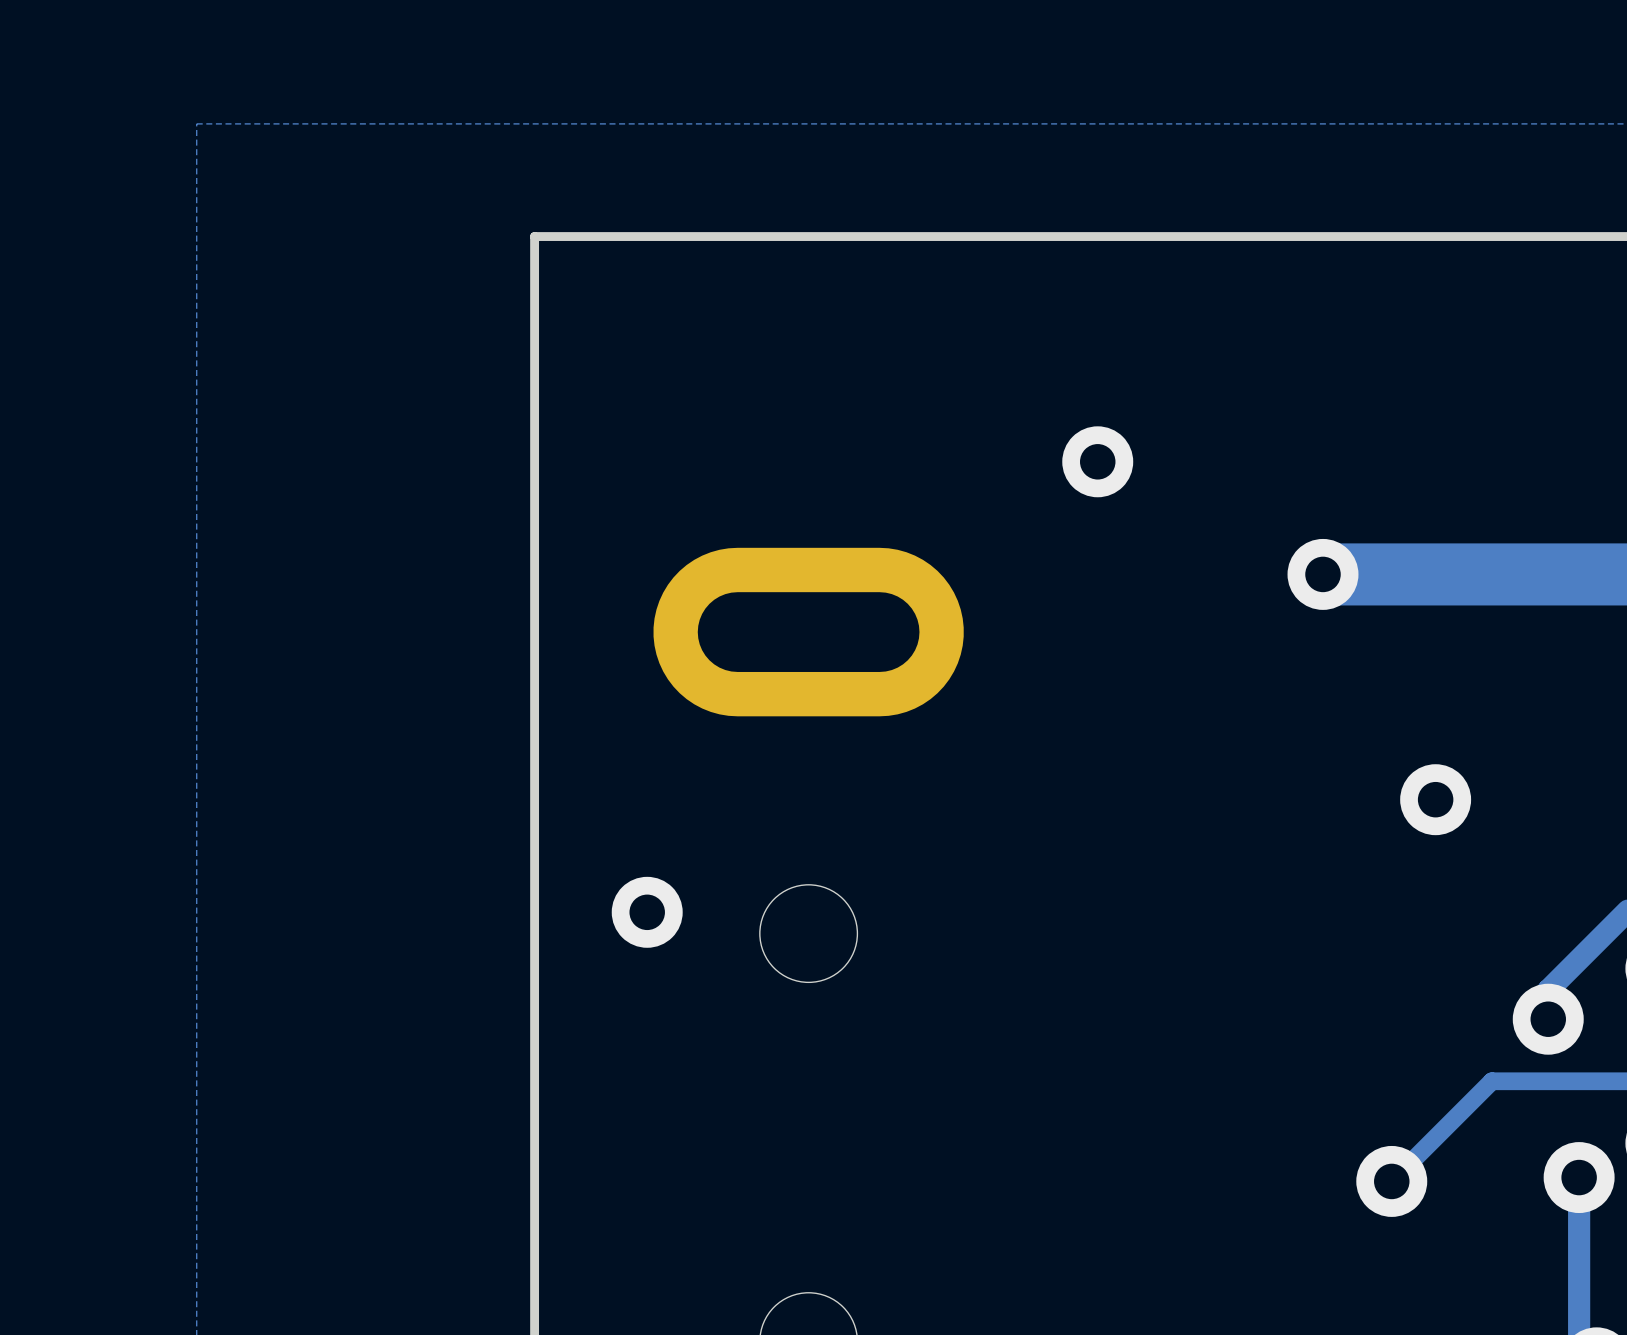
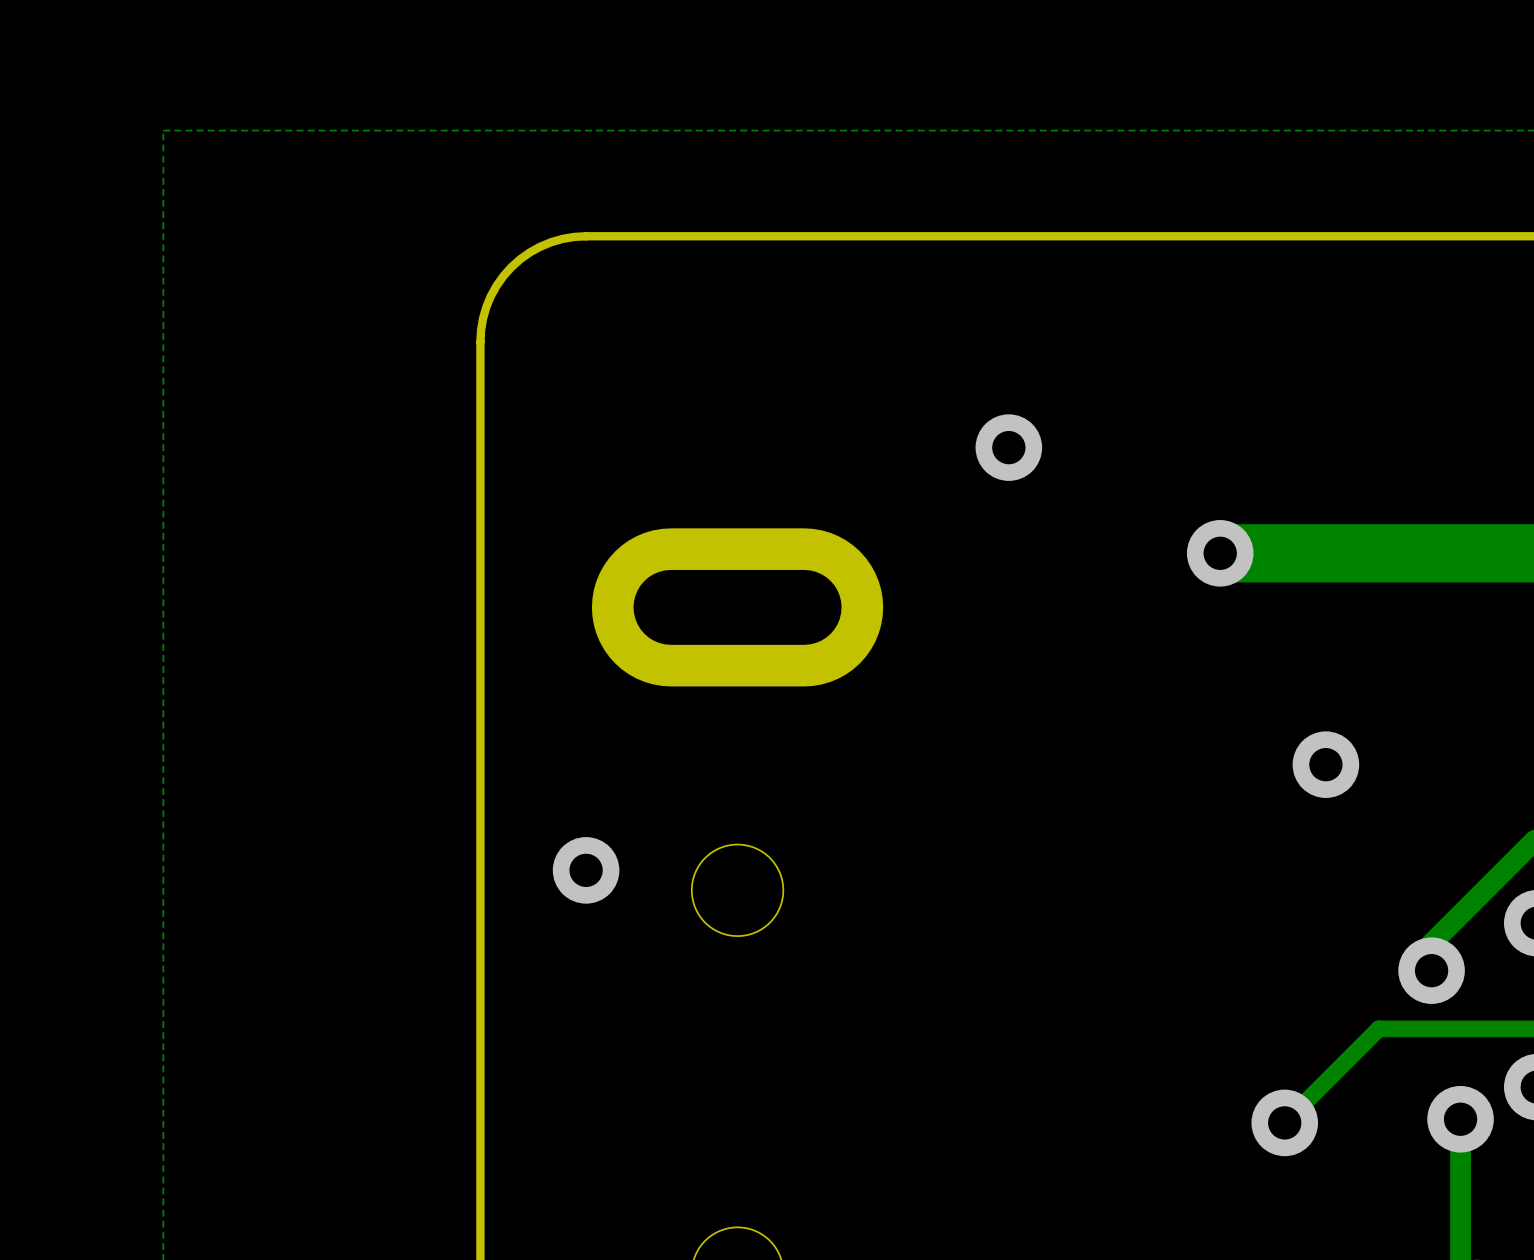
board edge: (647, 236) (534, 236) (534, 349) -> (586, 236) (551, 242) (529, 252) (511, 267) (490, 296) (483, 318) (480, 341)

